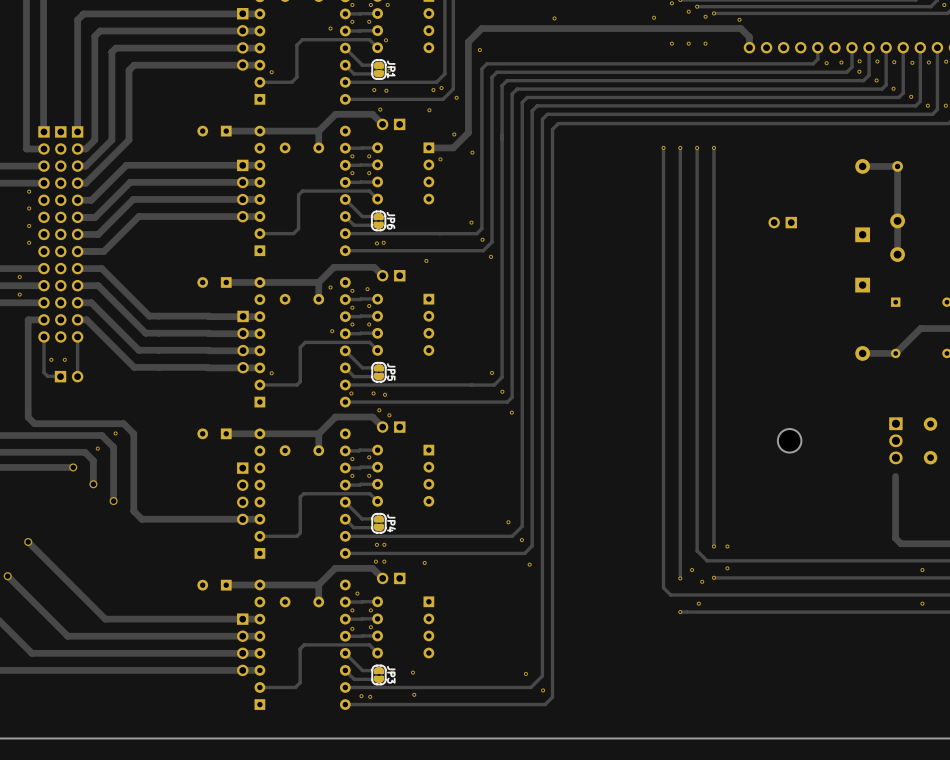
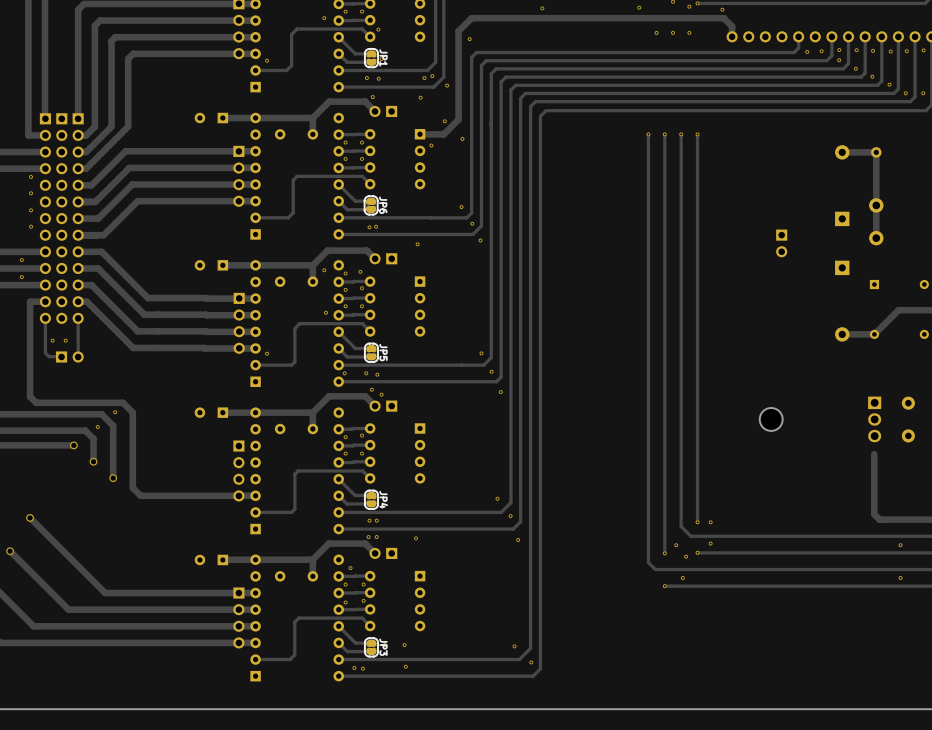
part rotation: 0° (782, 222) -> 90° counterclockwise (781, 243)
part position: (782, 222) -> (781, 243)

